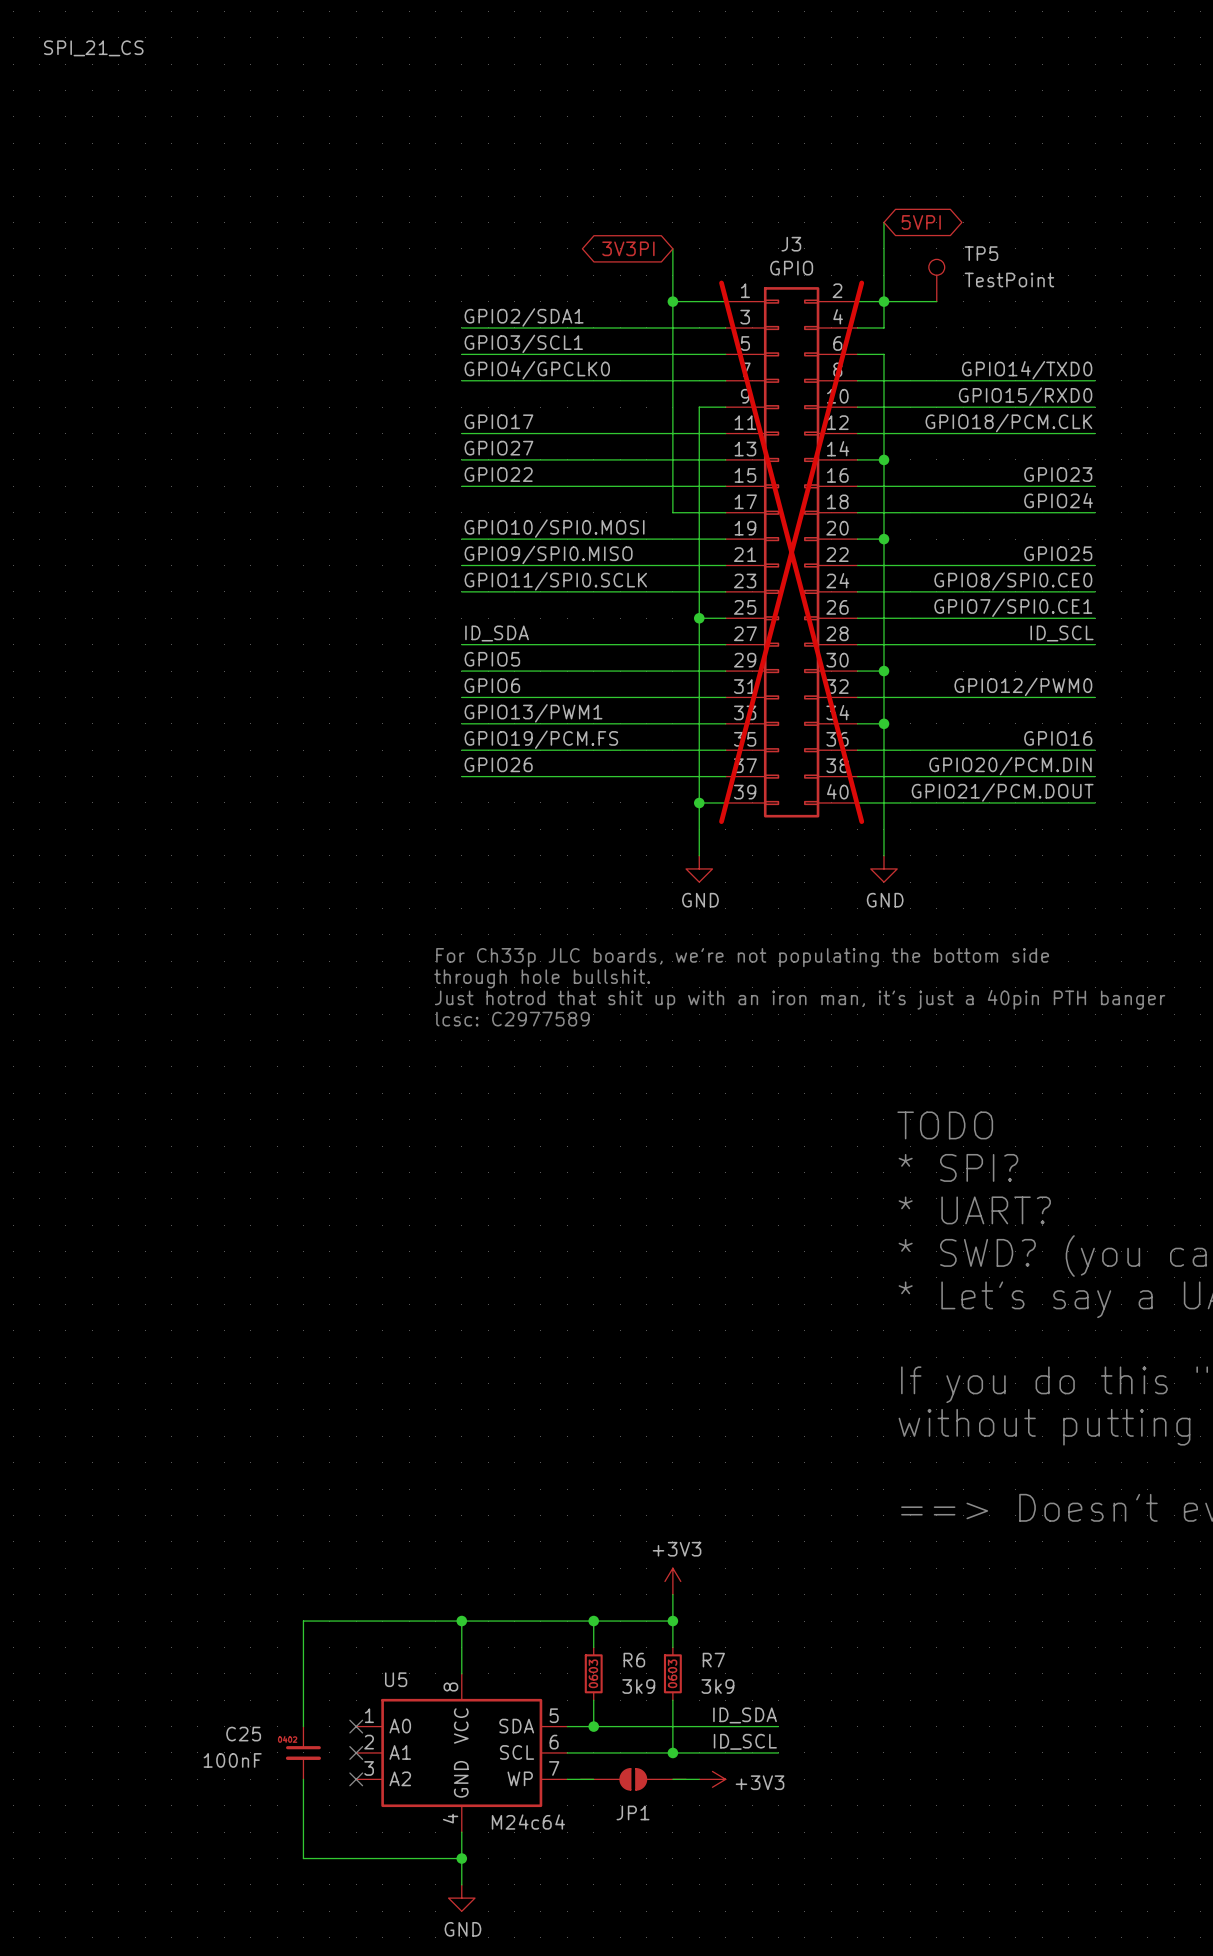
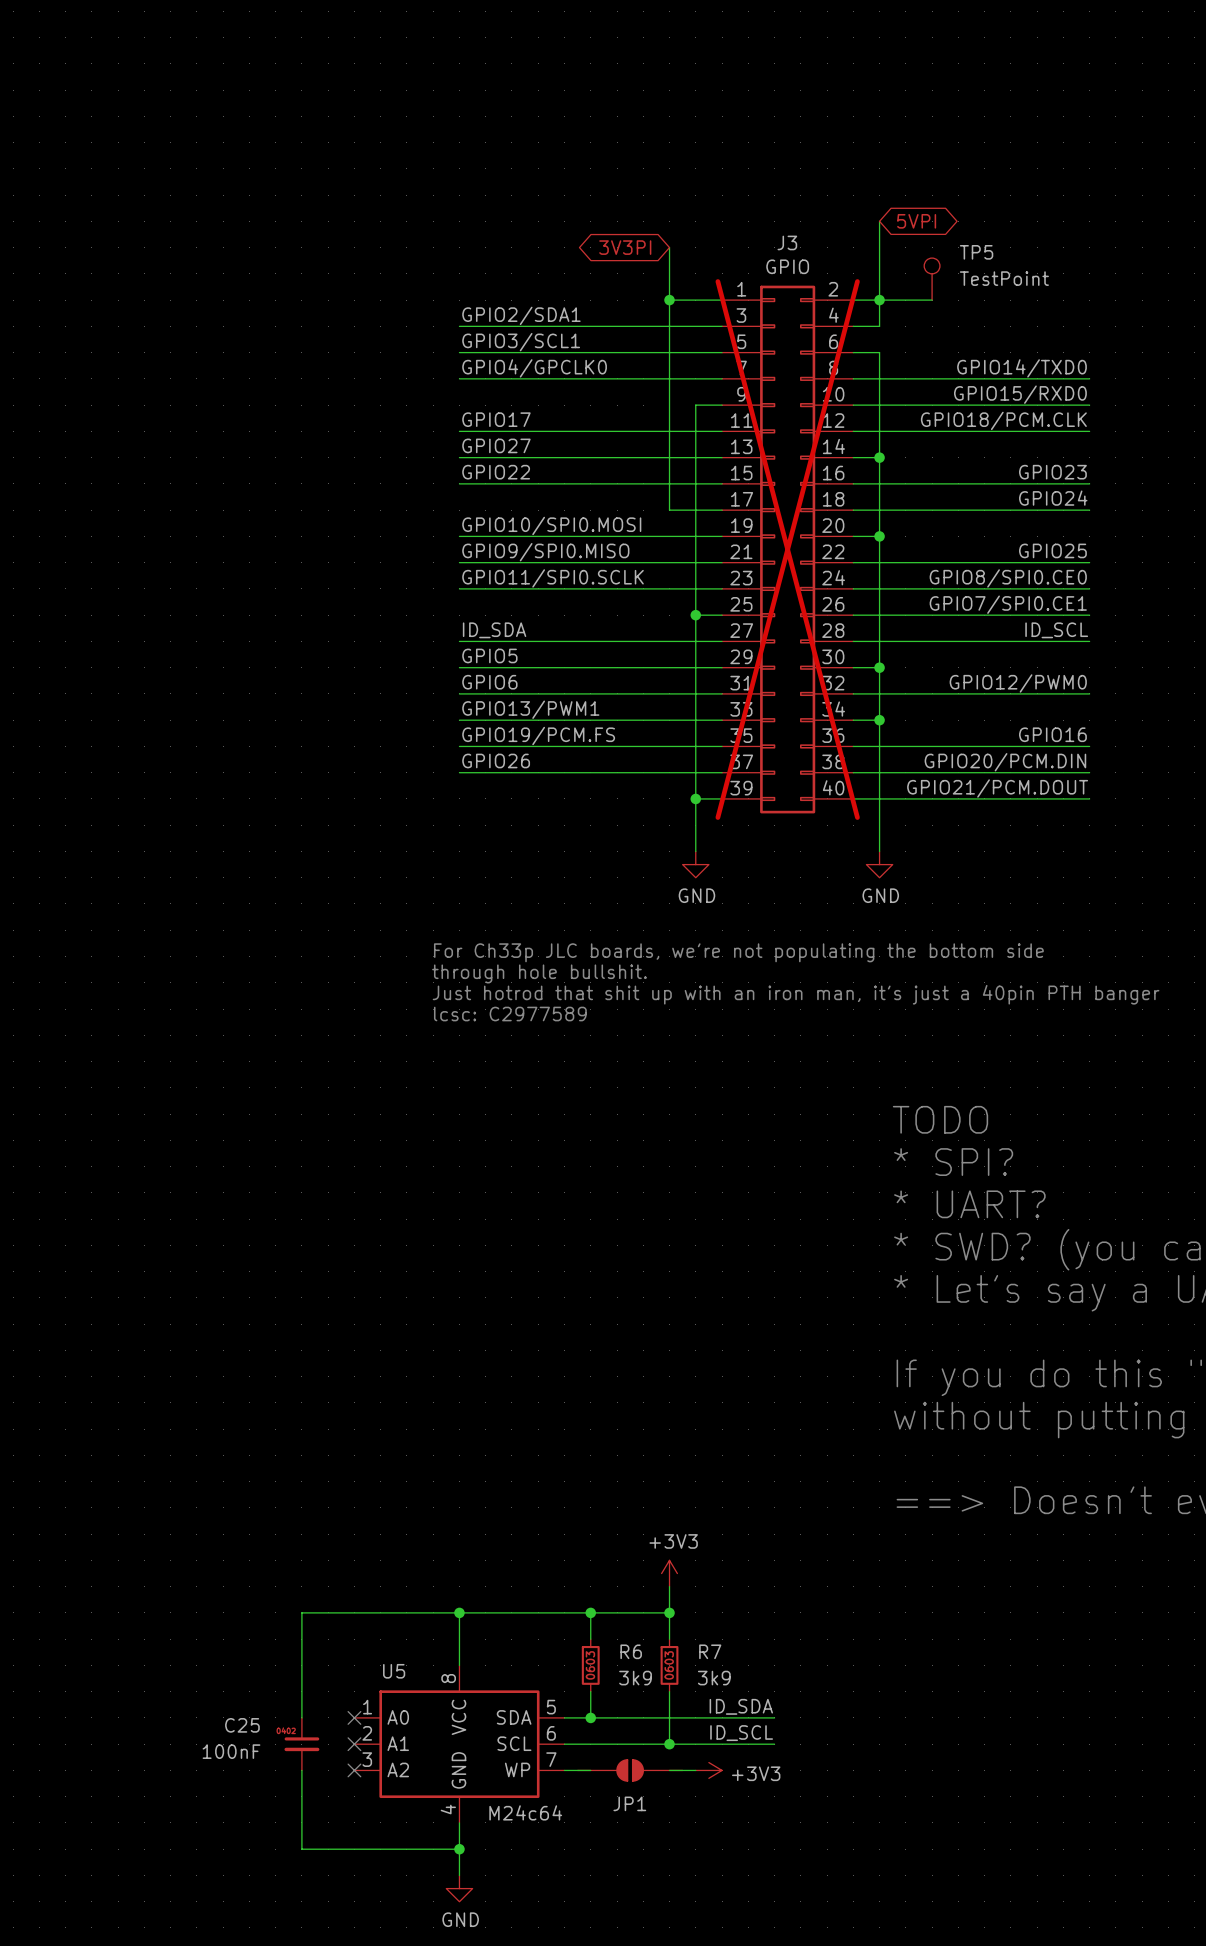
label: SPI_21_CS (93, 48) -> none

